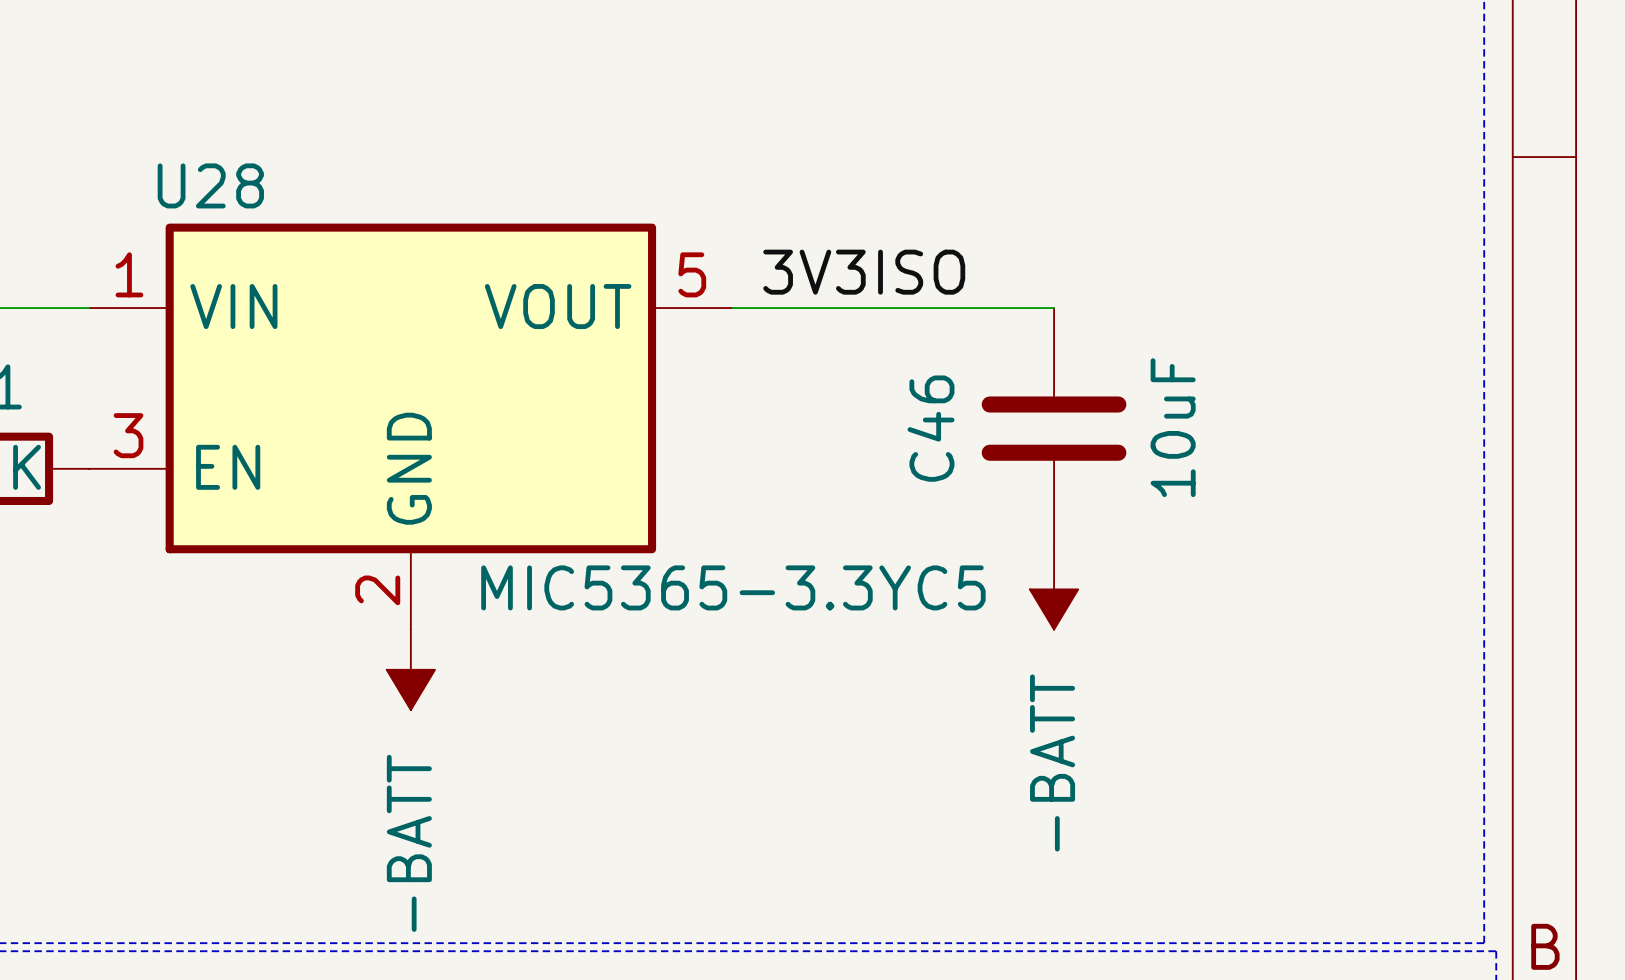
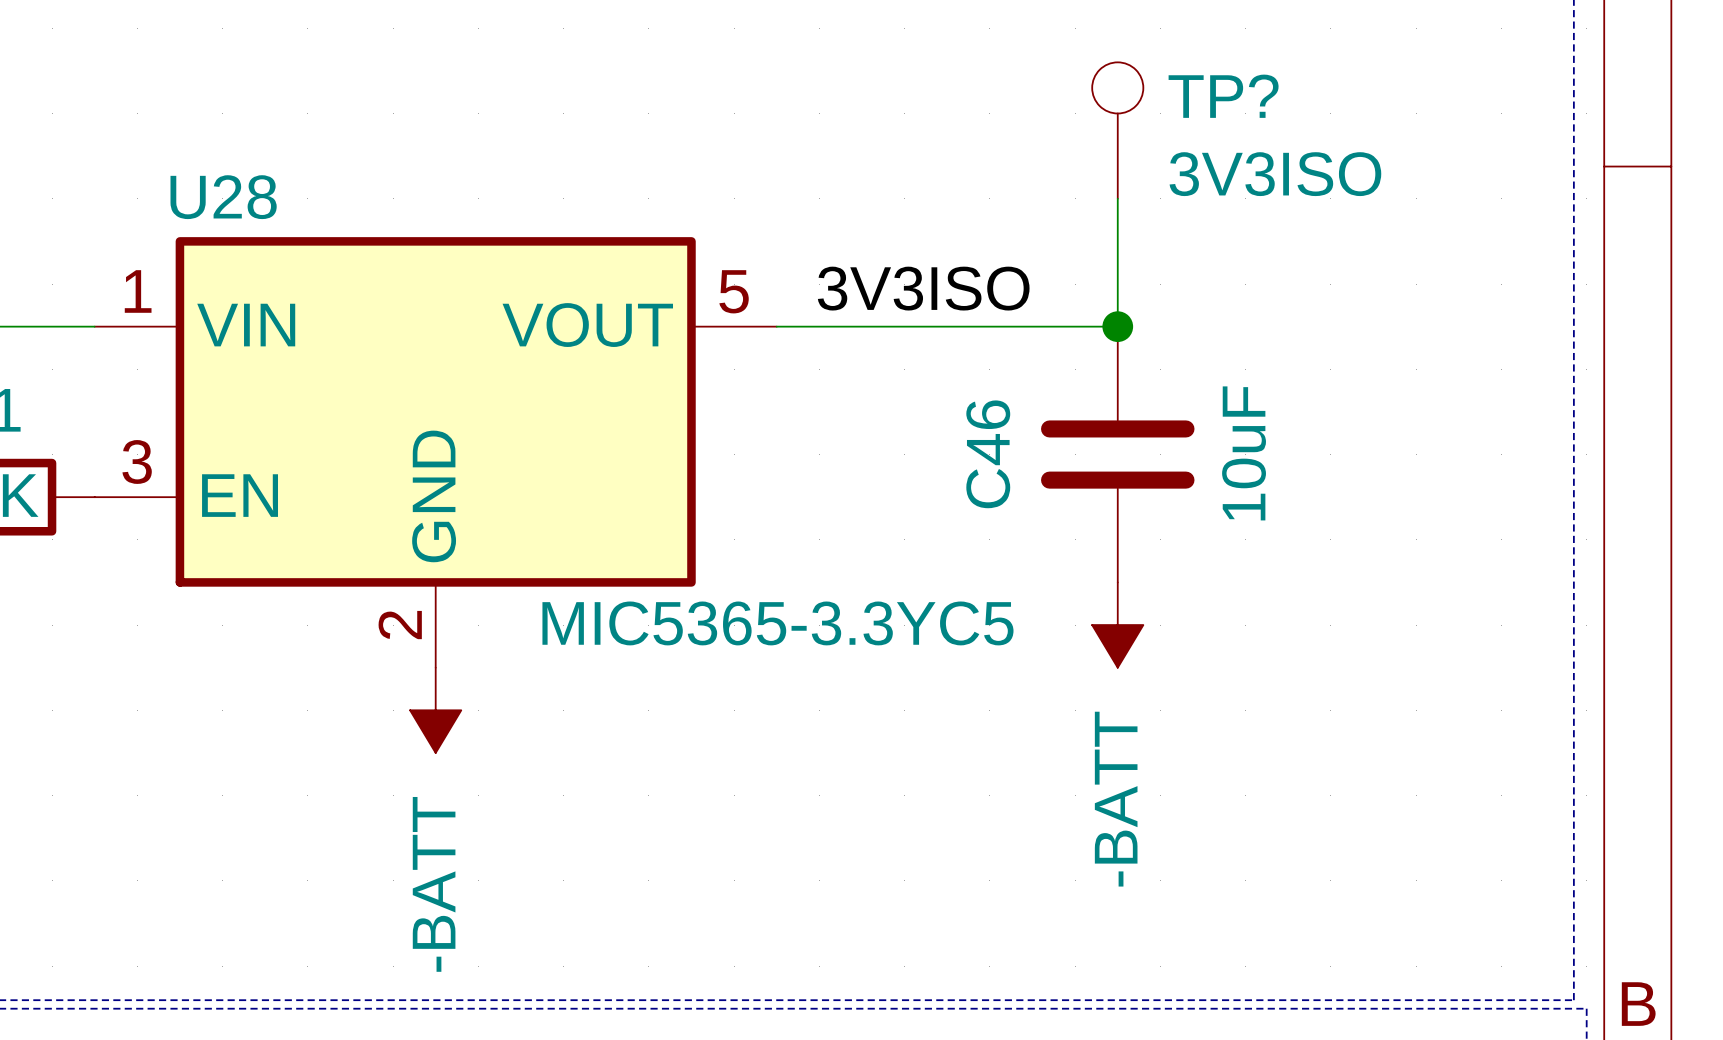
TP?: none -> 3V3ISO (1117, 130)
wire: none -> (1117, 198) (1117, 326)
junction: none -> (1117, 326)

